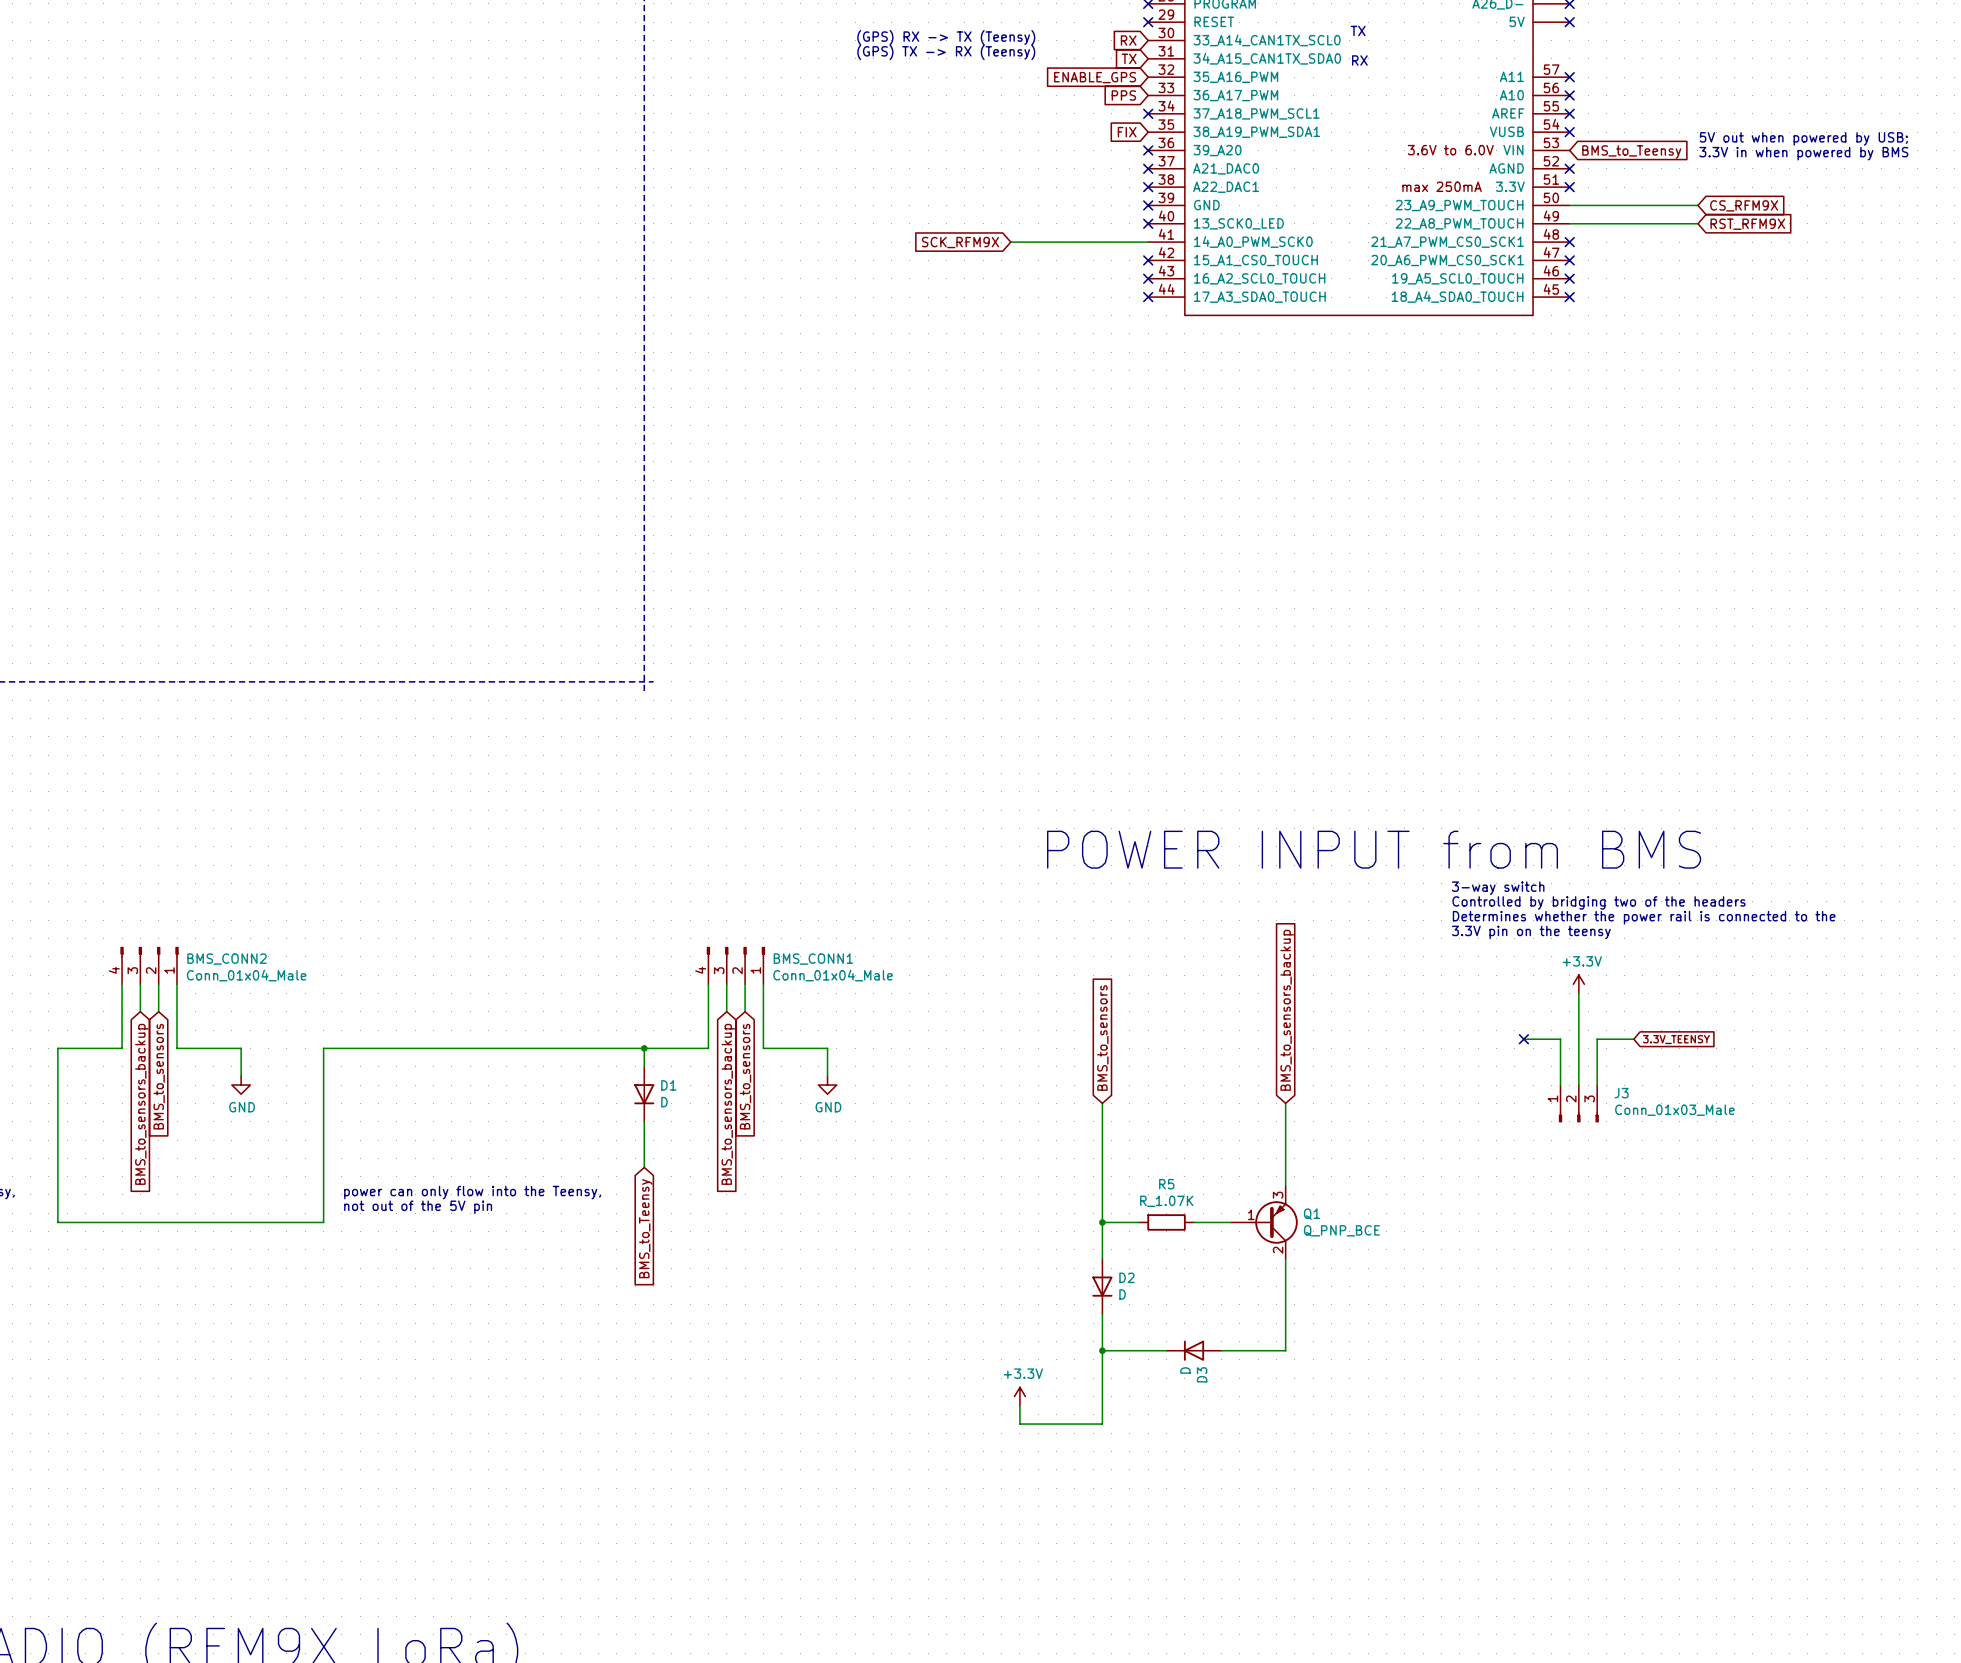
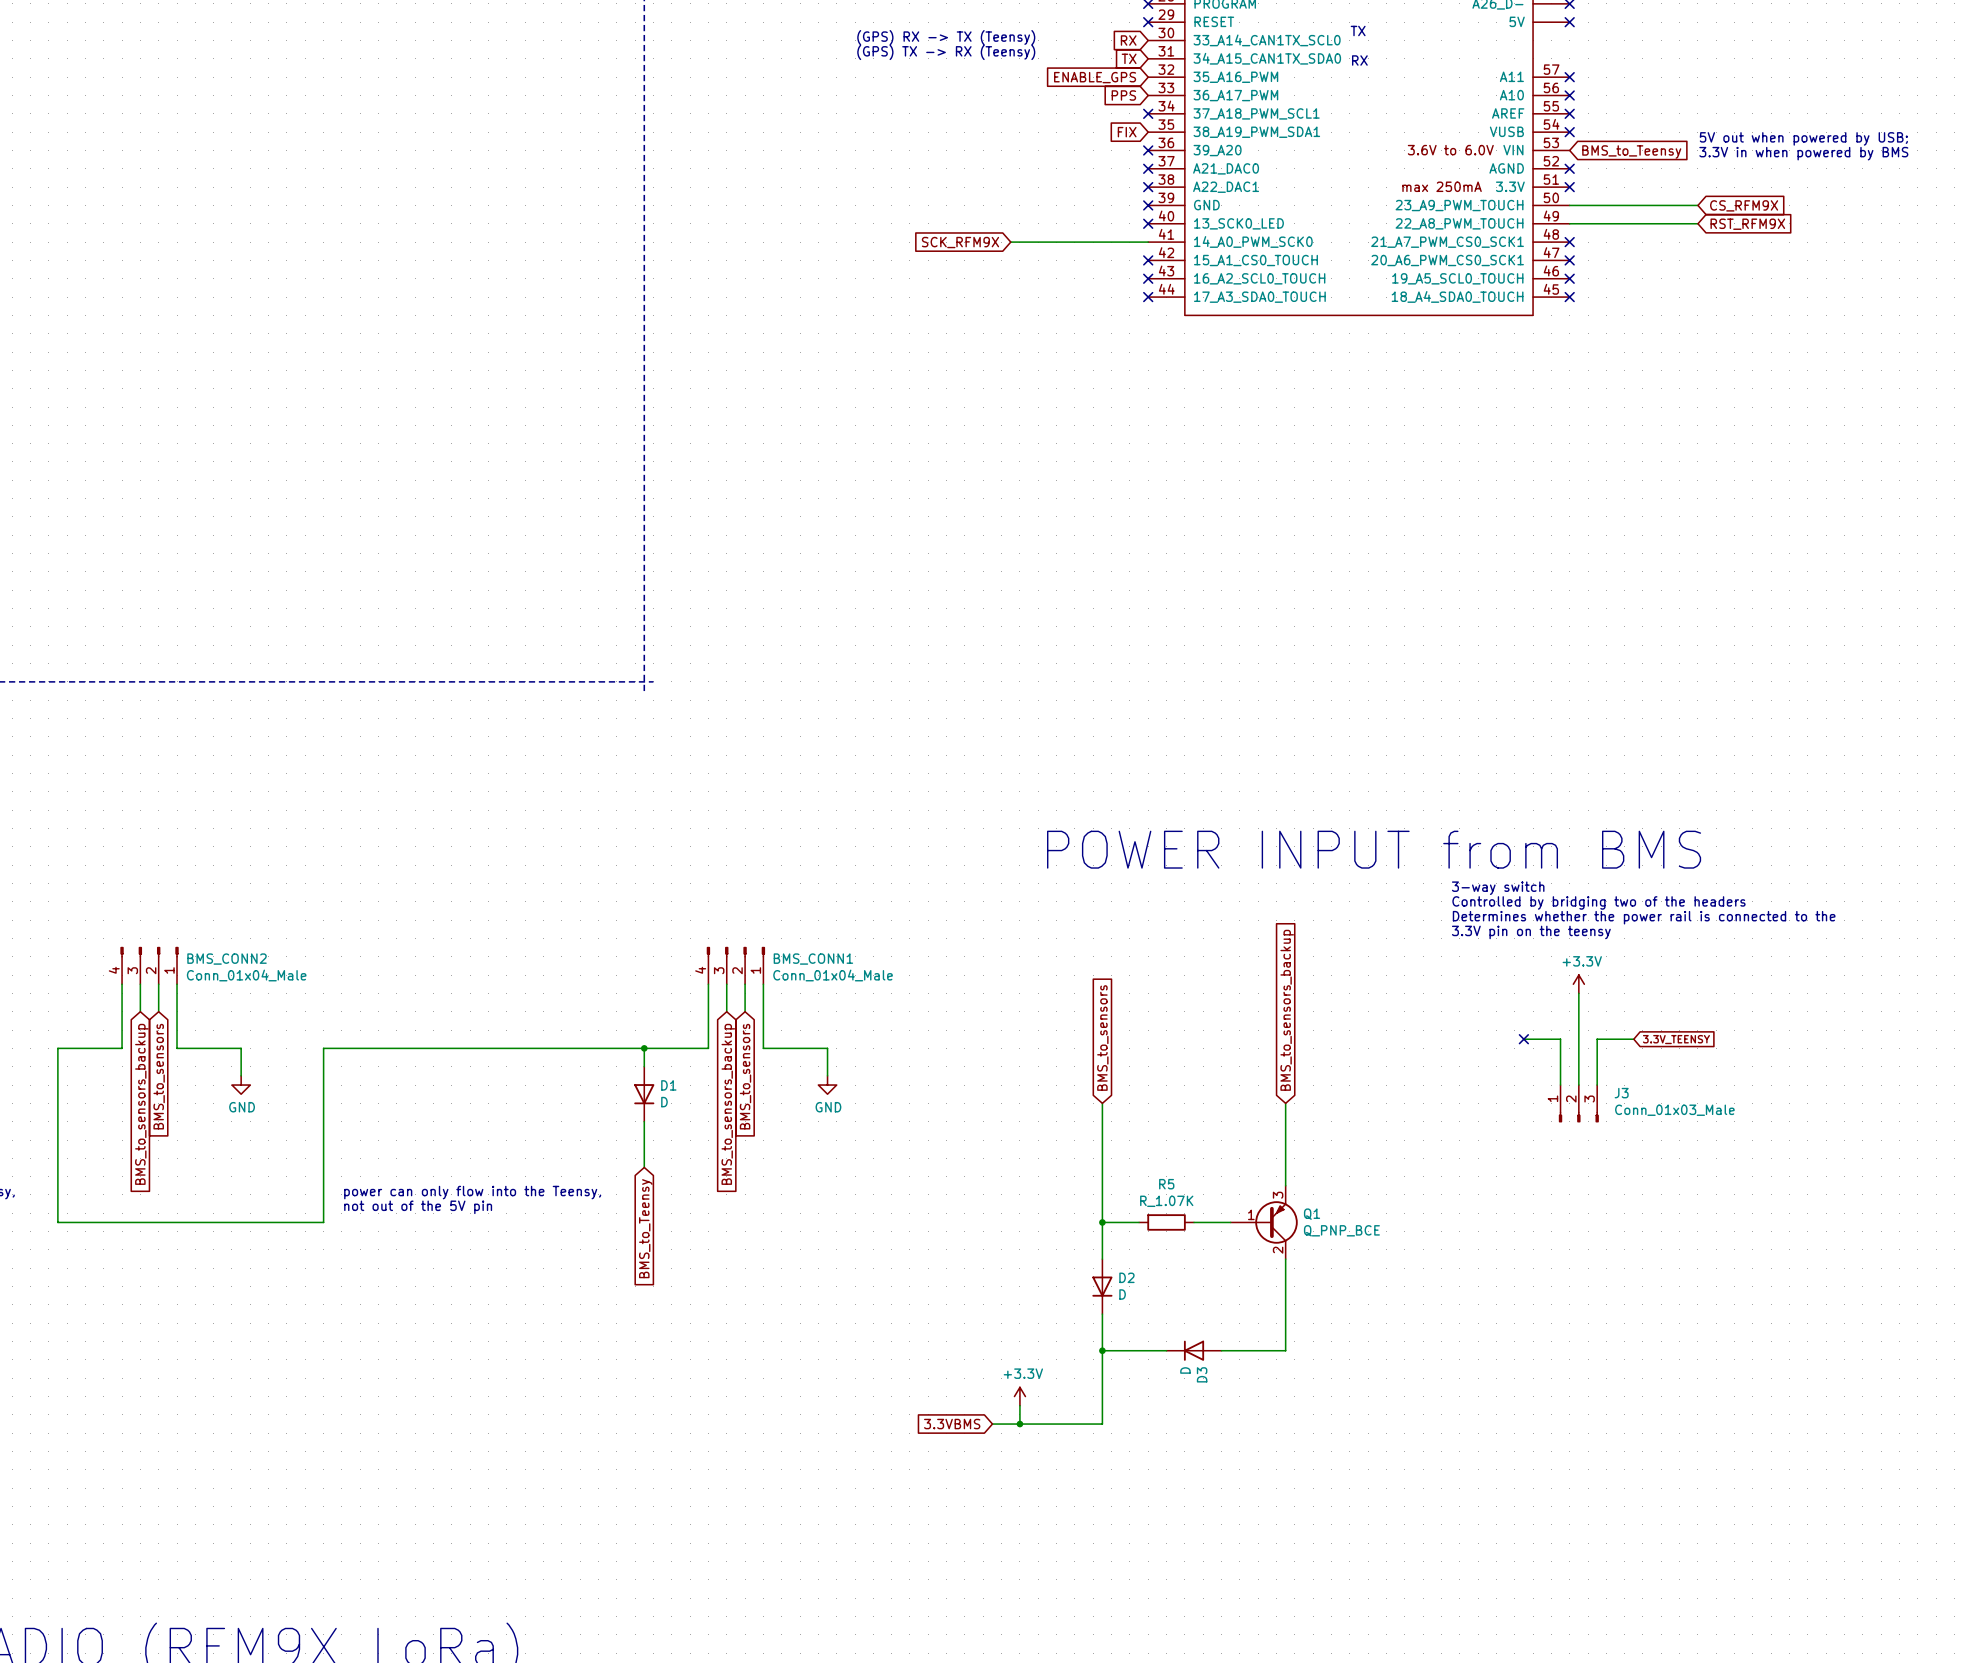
global label: none -> 3.3VBMS (952, 1424)
wire: none -> (992, 1424) (1019, 1424)
junction: none -> (1019, 1424)

